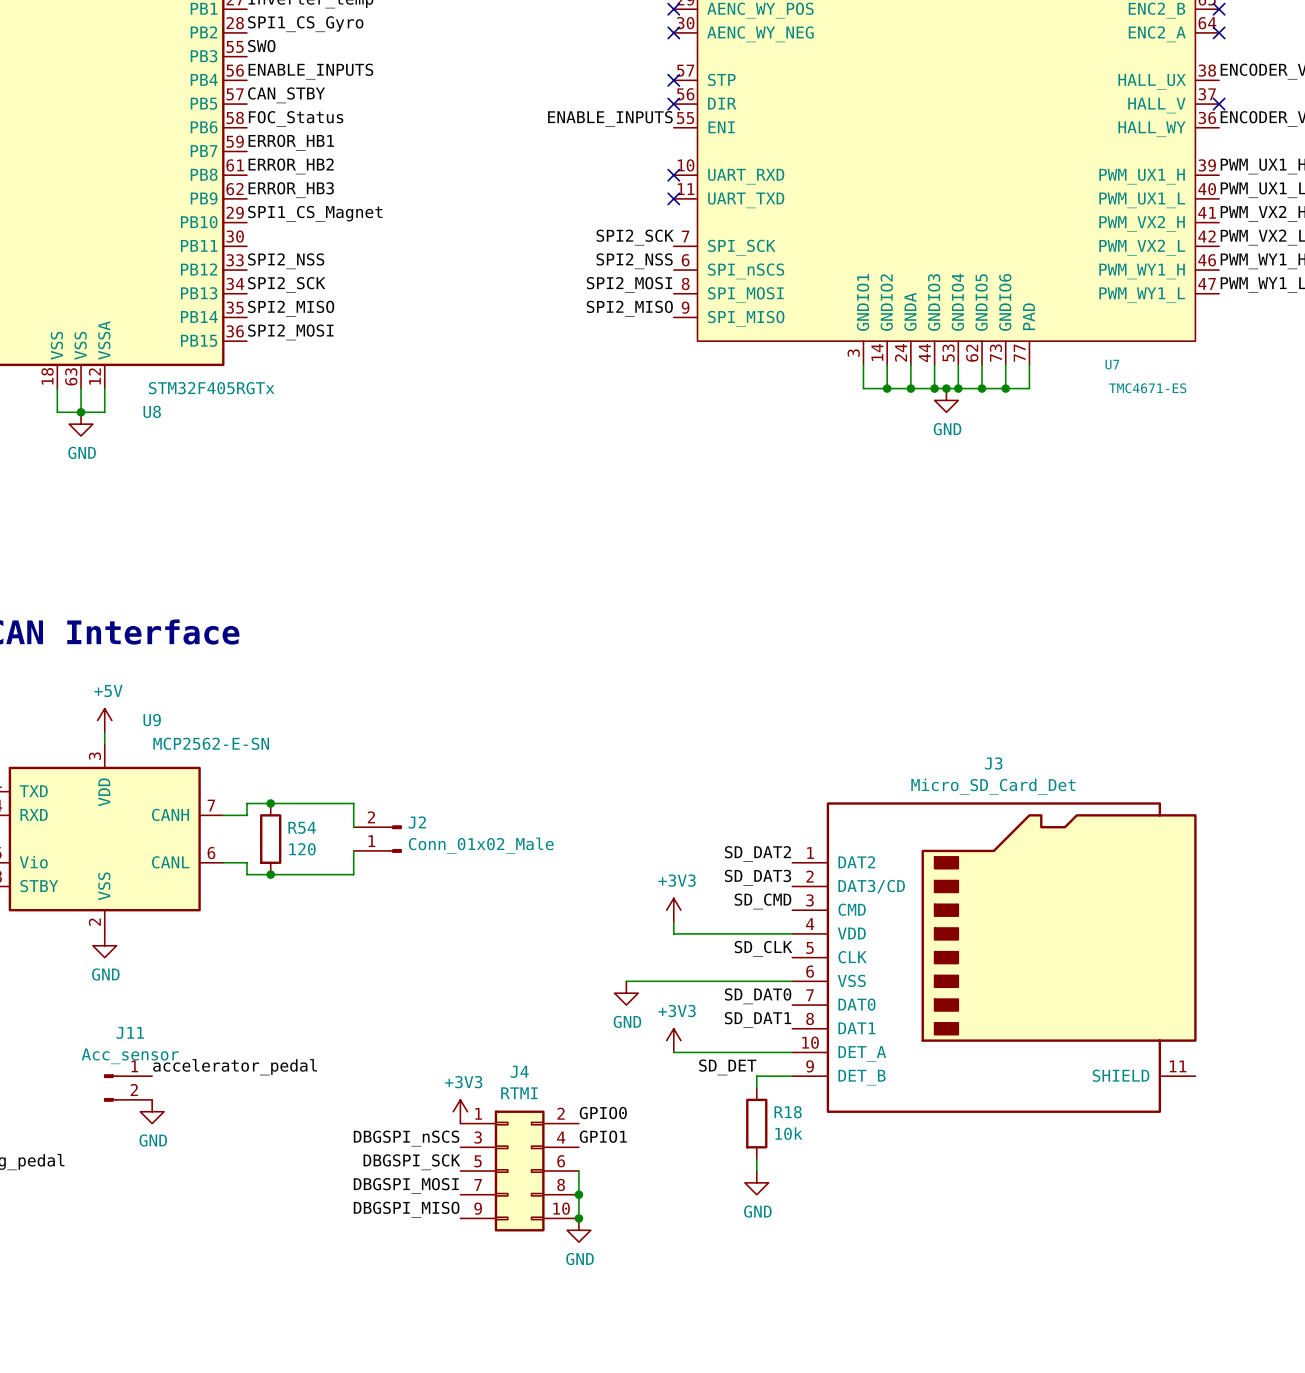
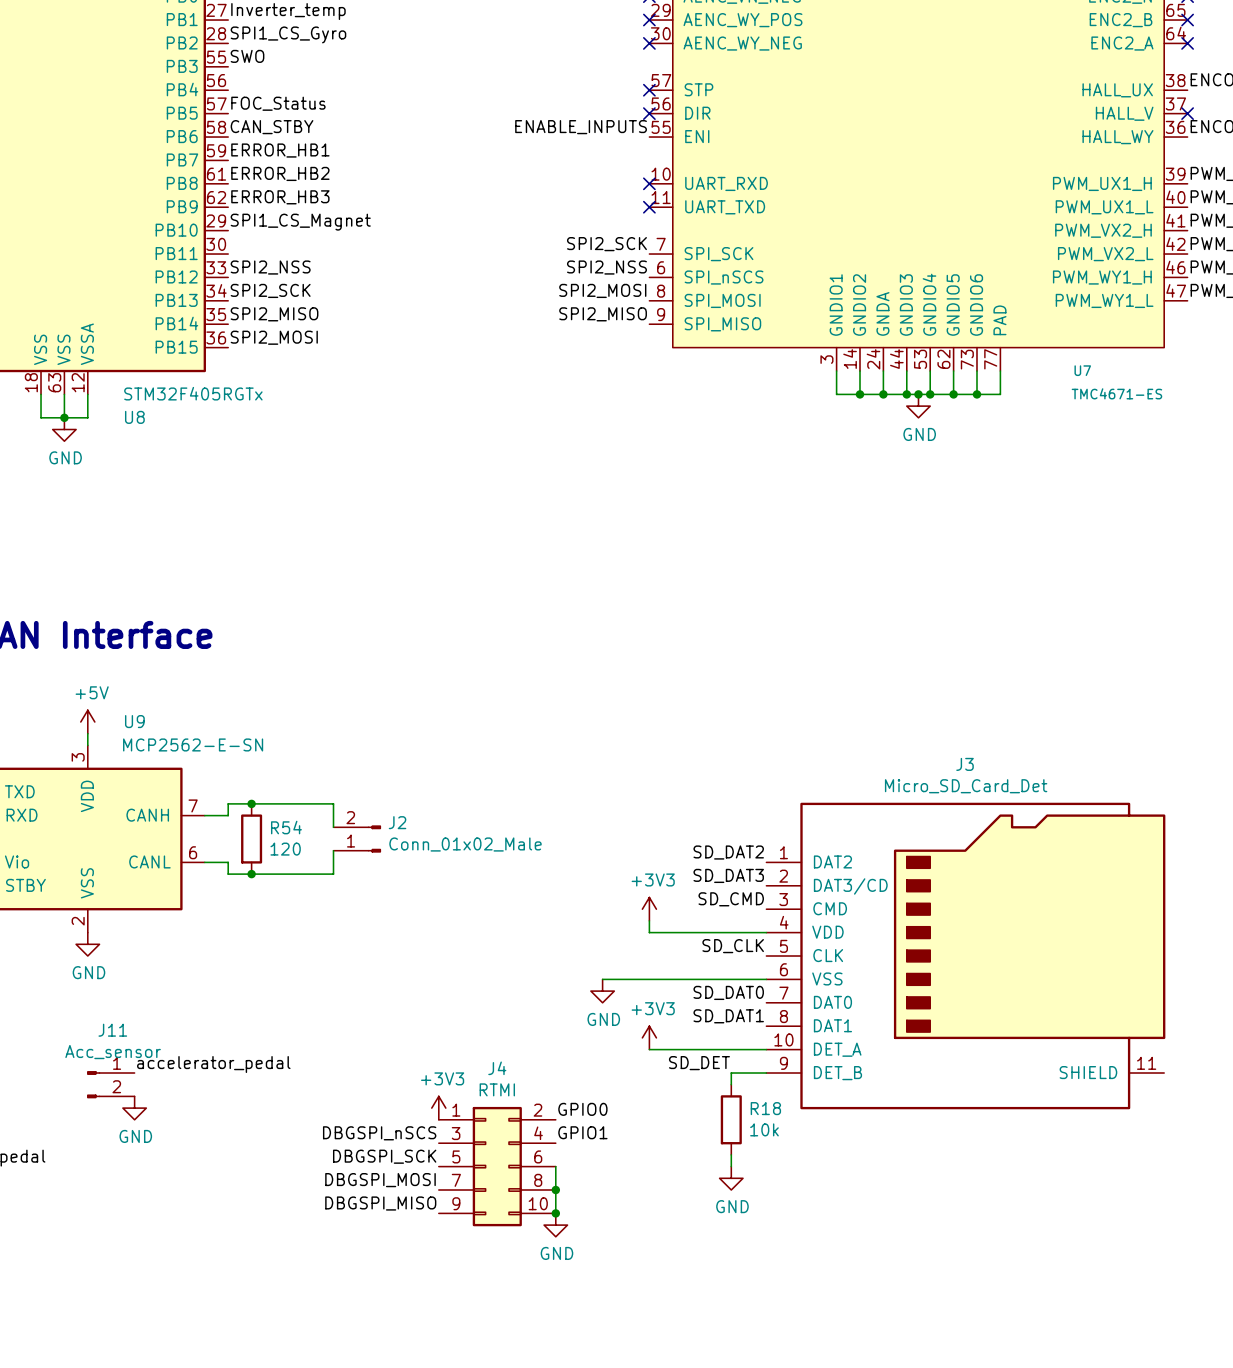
label: ENABLE_INPUTS (310, 71) -> none
label: CAN_STBY (286, 95) -> FOC_Status (278, 103)
label: FOC_Status (296, 119) -> CAN_STBY (272, 127)

